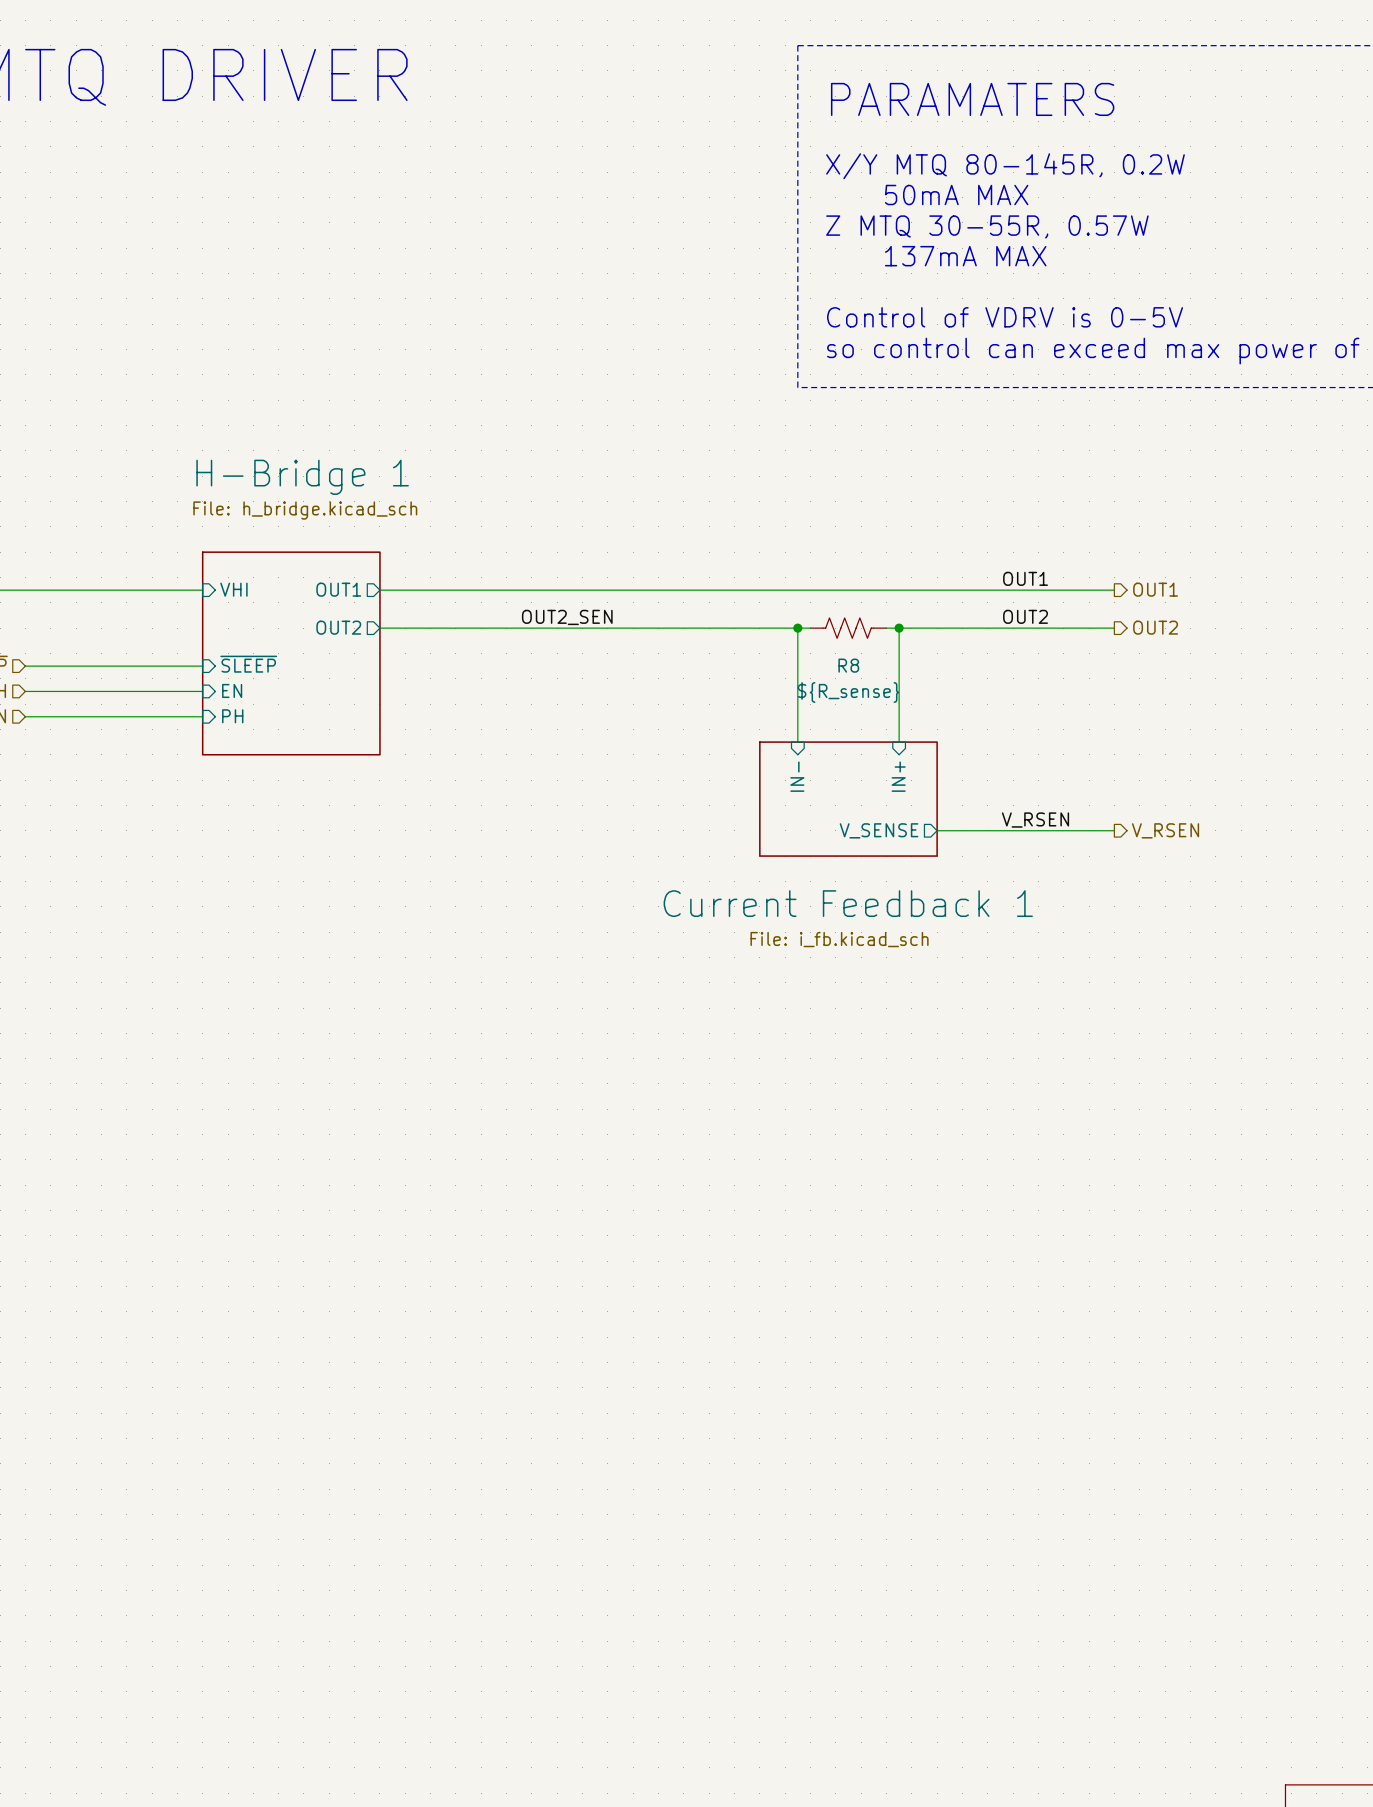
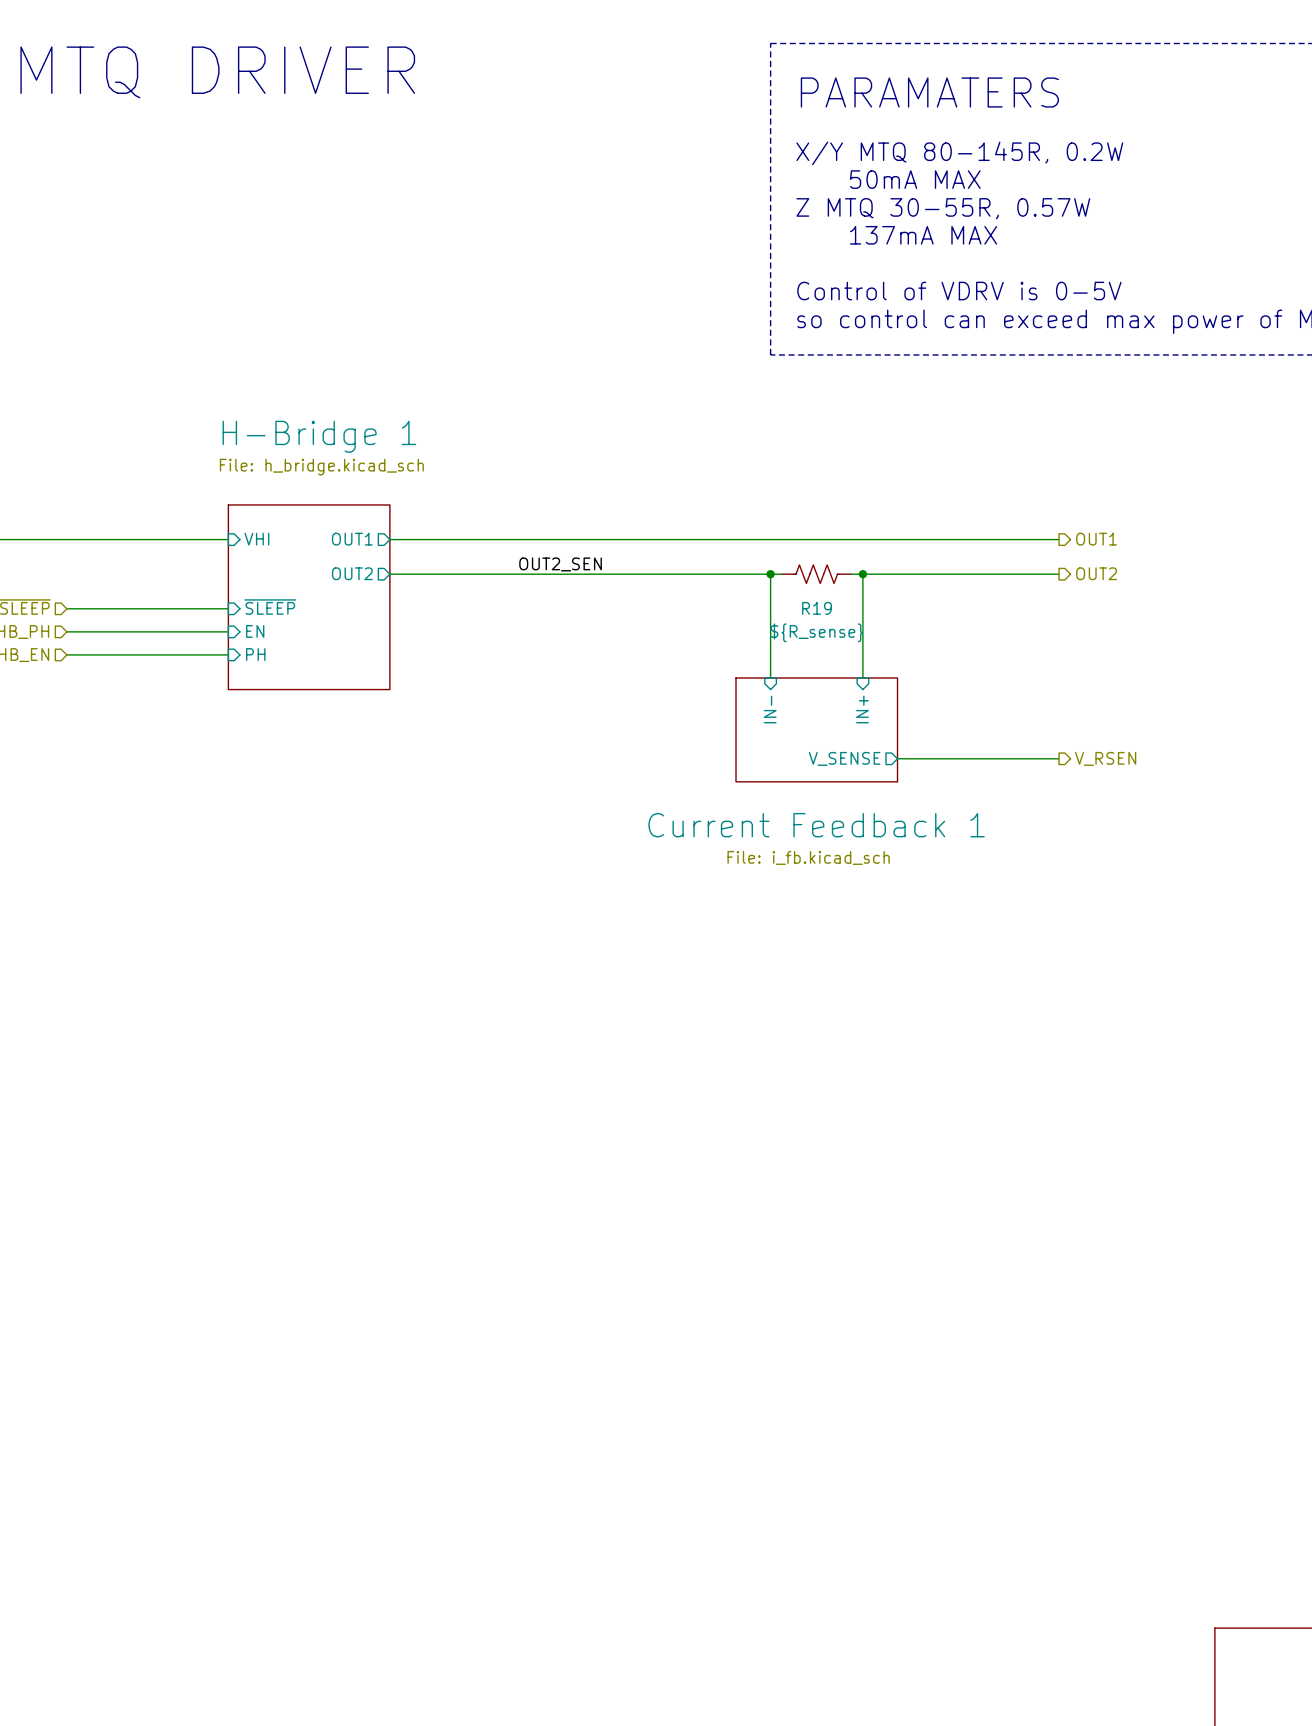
label: OUT1 (1025, 578) -> none
label: OUT2 (1025, 616) -> none
R8 name: R8 (848, 665) -> R19 (817, 608)
label: V_RSEN (1035, 820) -> none

